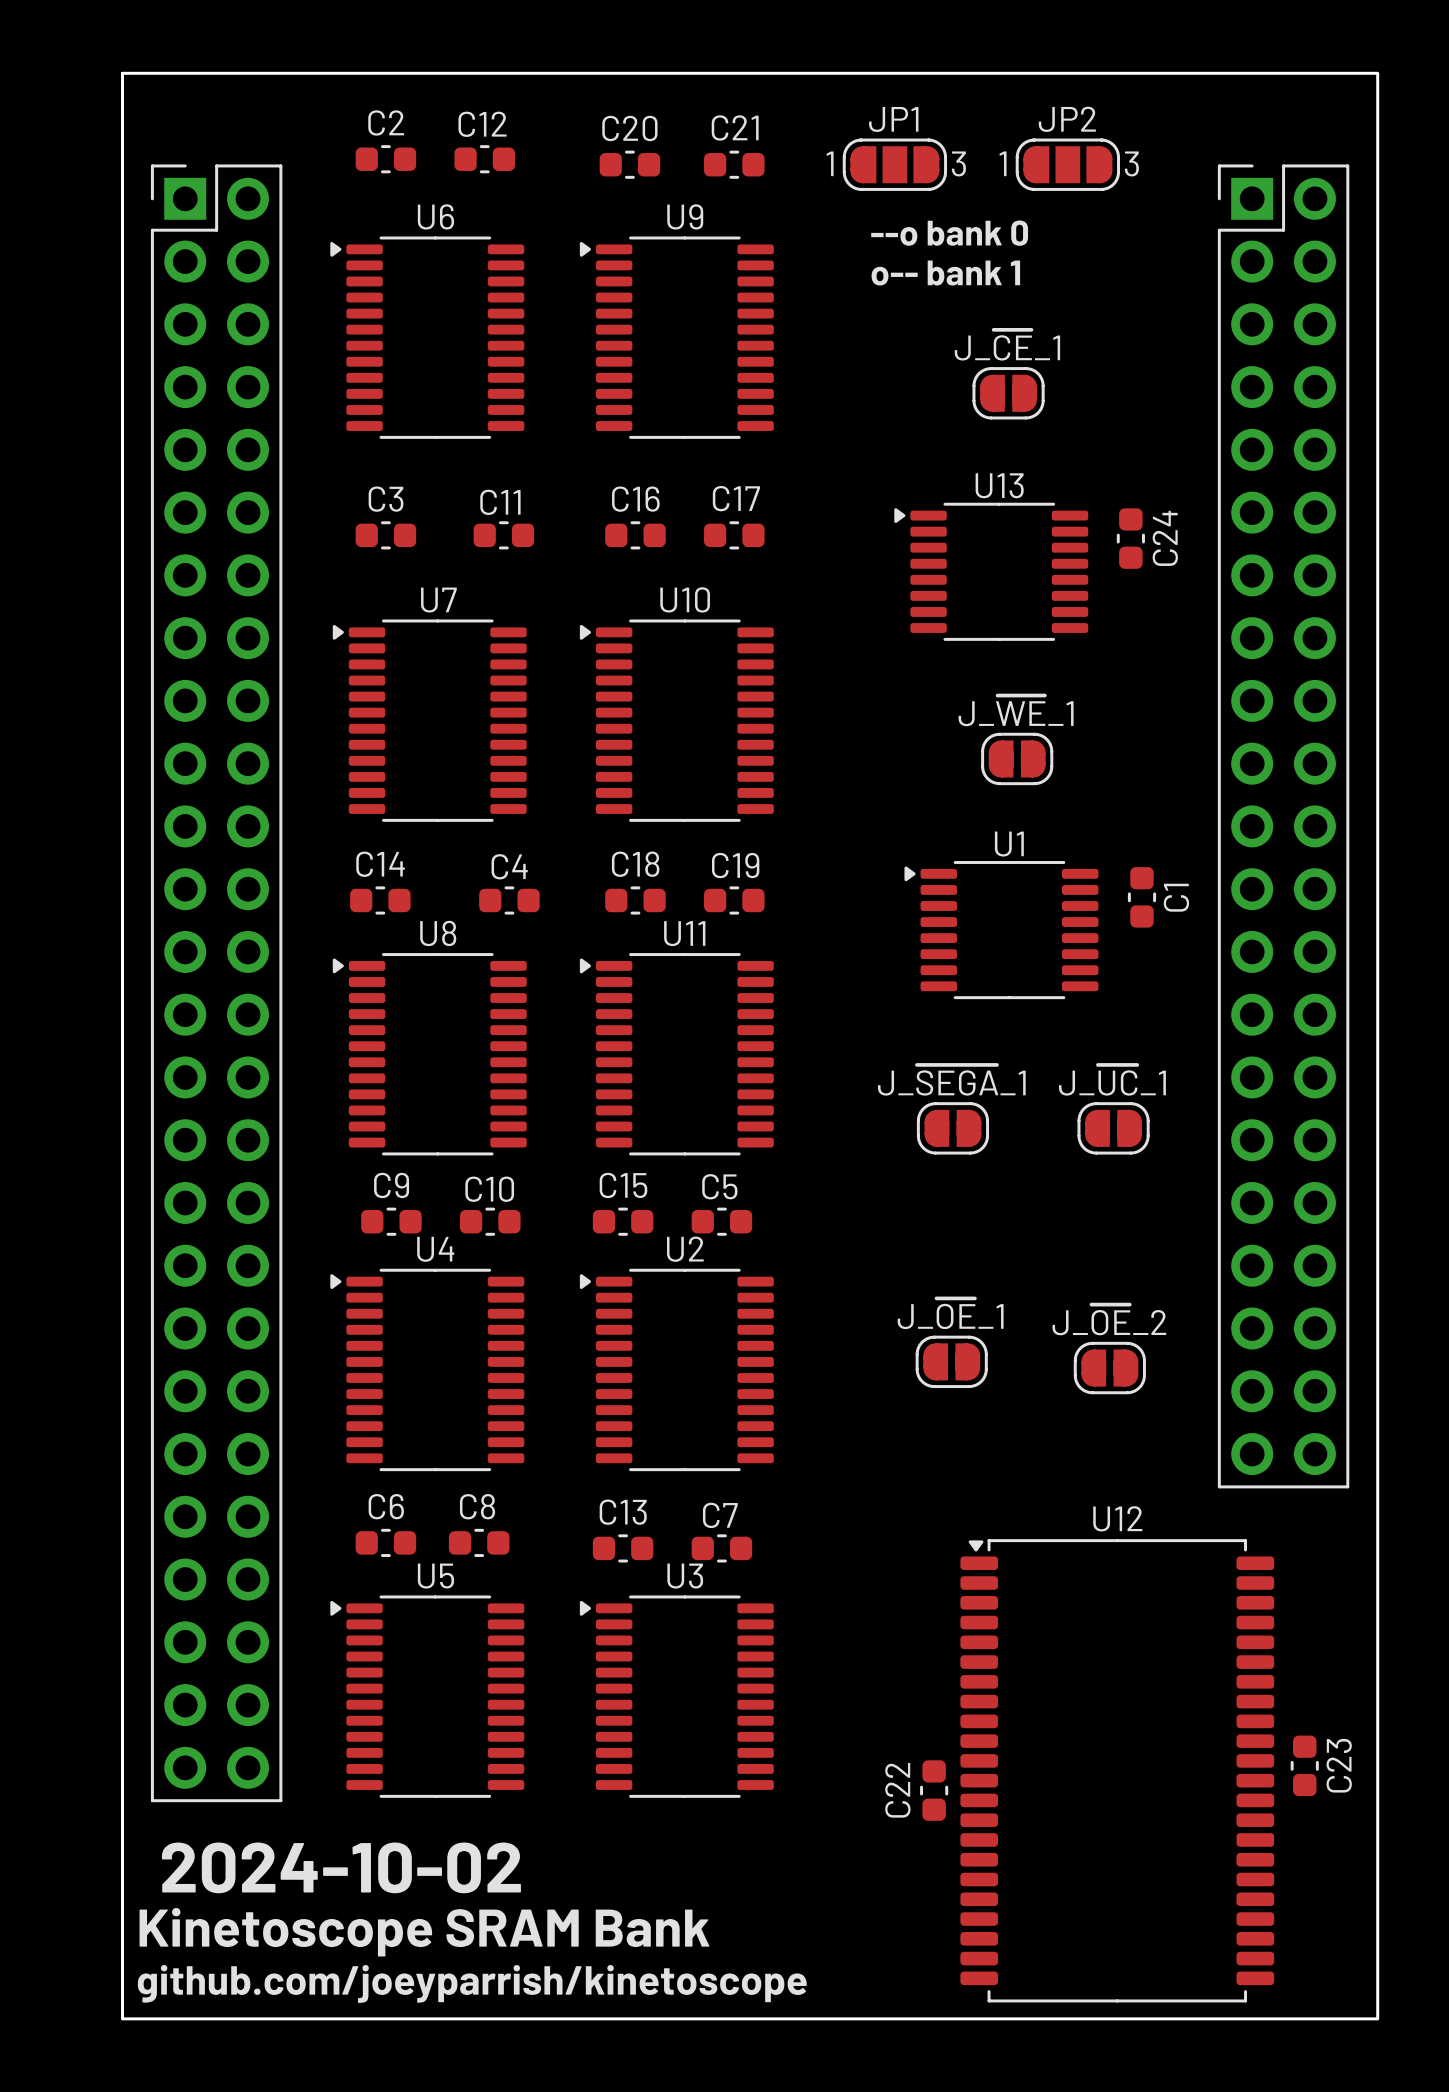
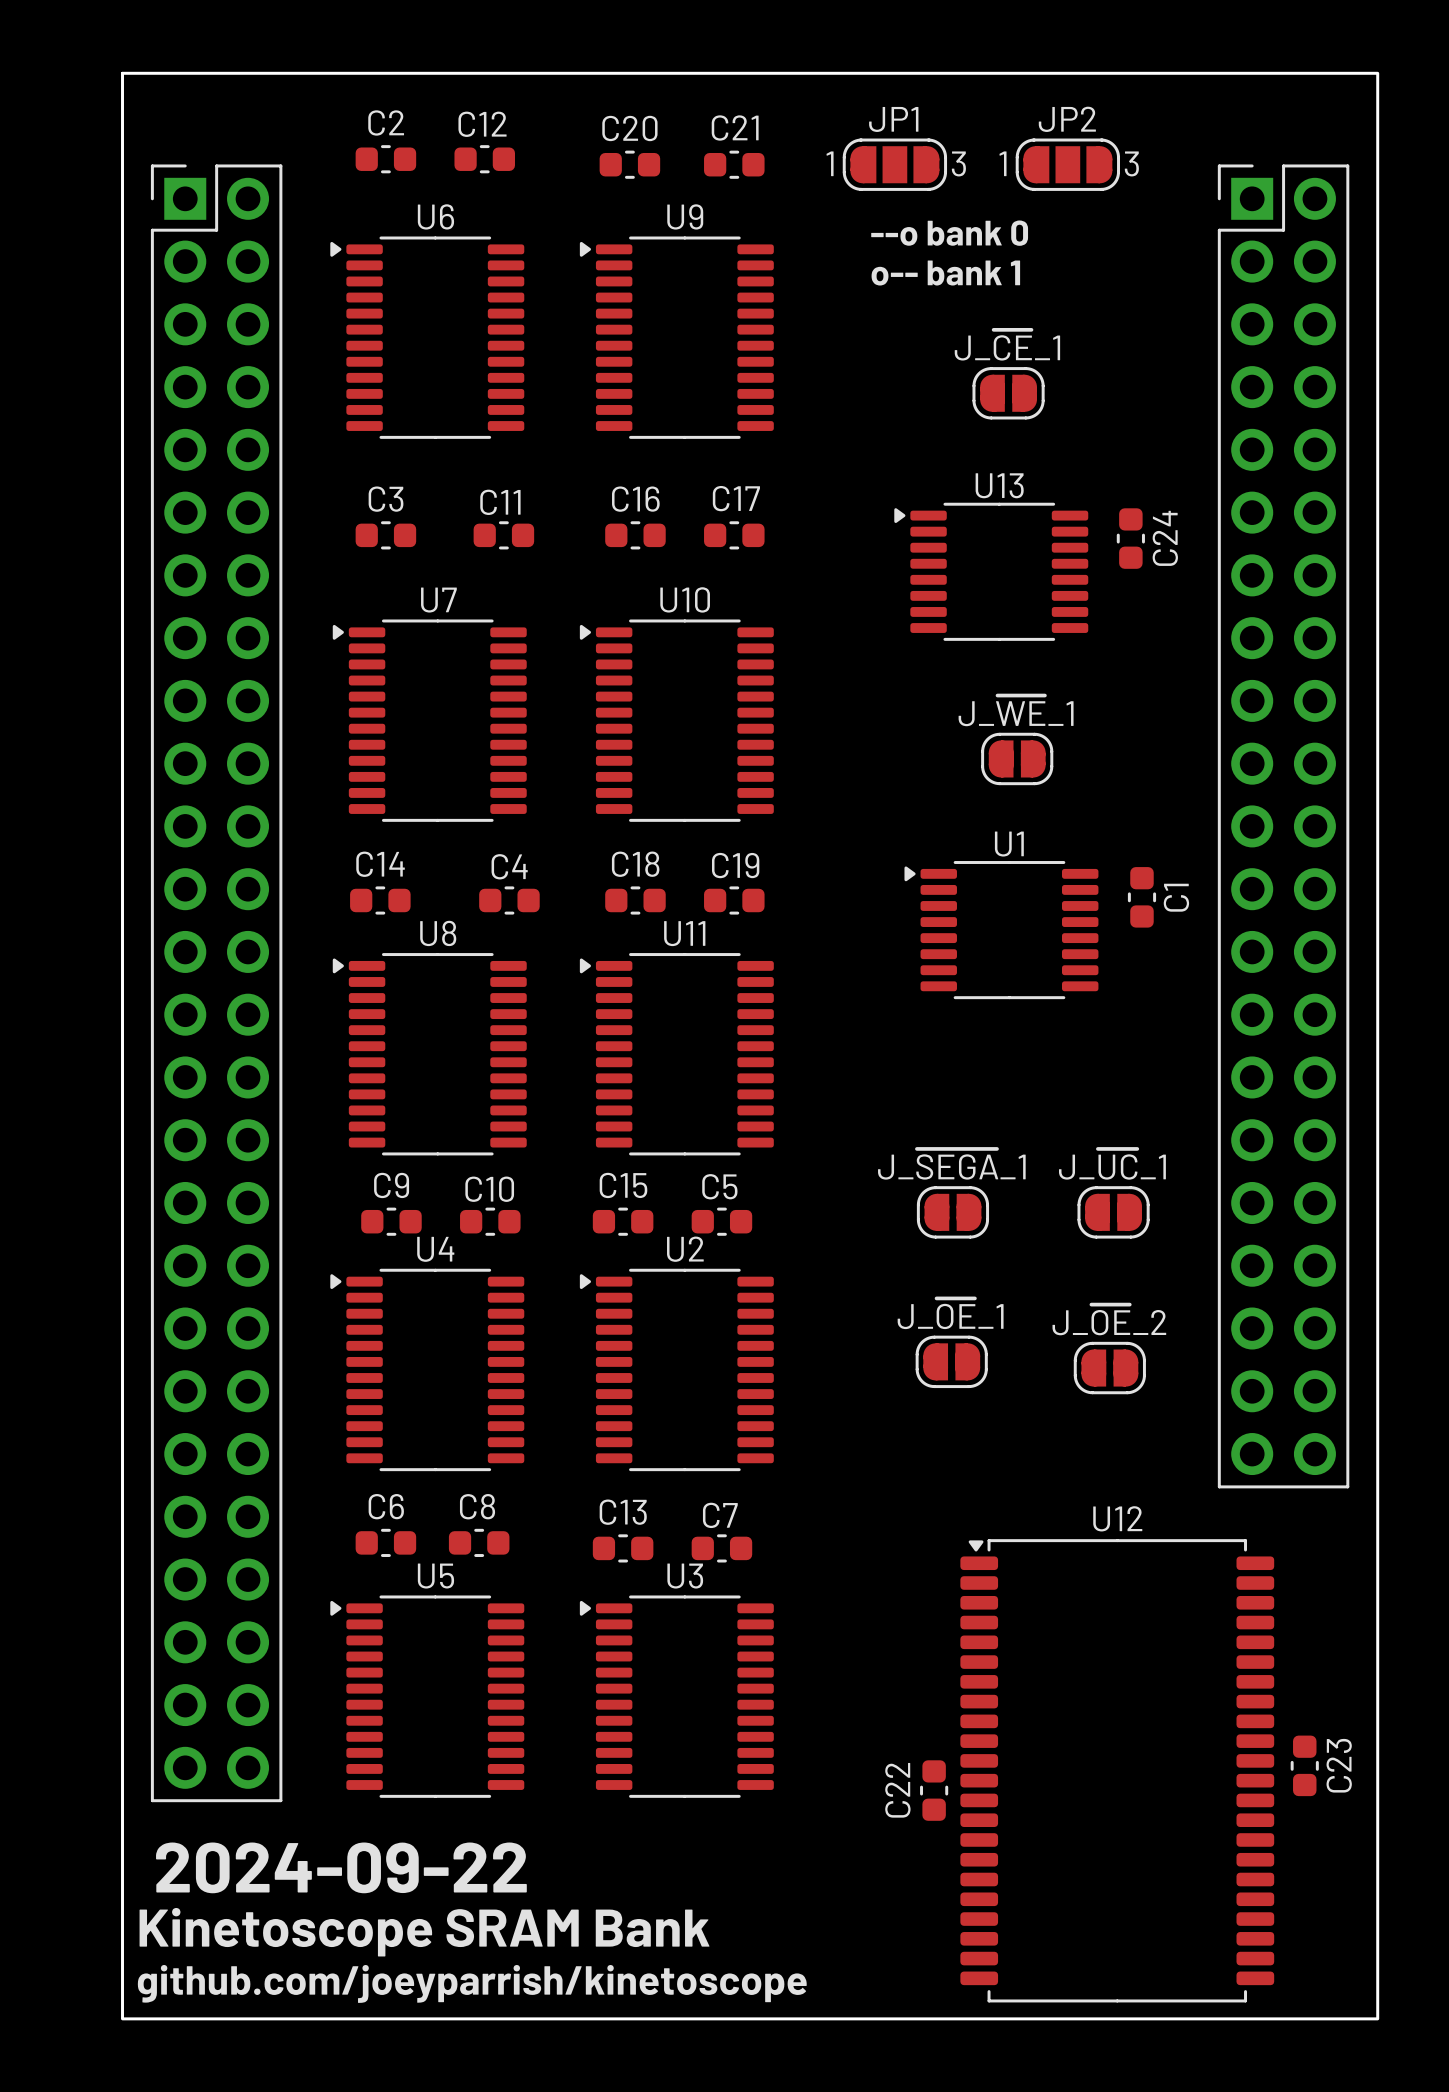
J_~{SEGA}_1 position: (952, 1128) -> (952, 1212)
J_~{UC}_1 position: (1113, 1128) -> (1113, 1212)
text: 2024-10-02 (341, 1867) -> 2024-09-22 (341, 1867)

